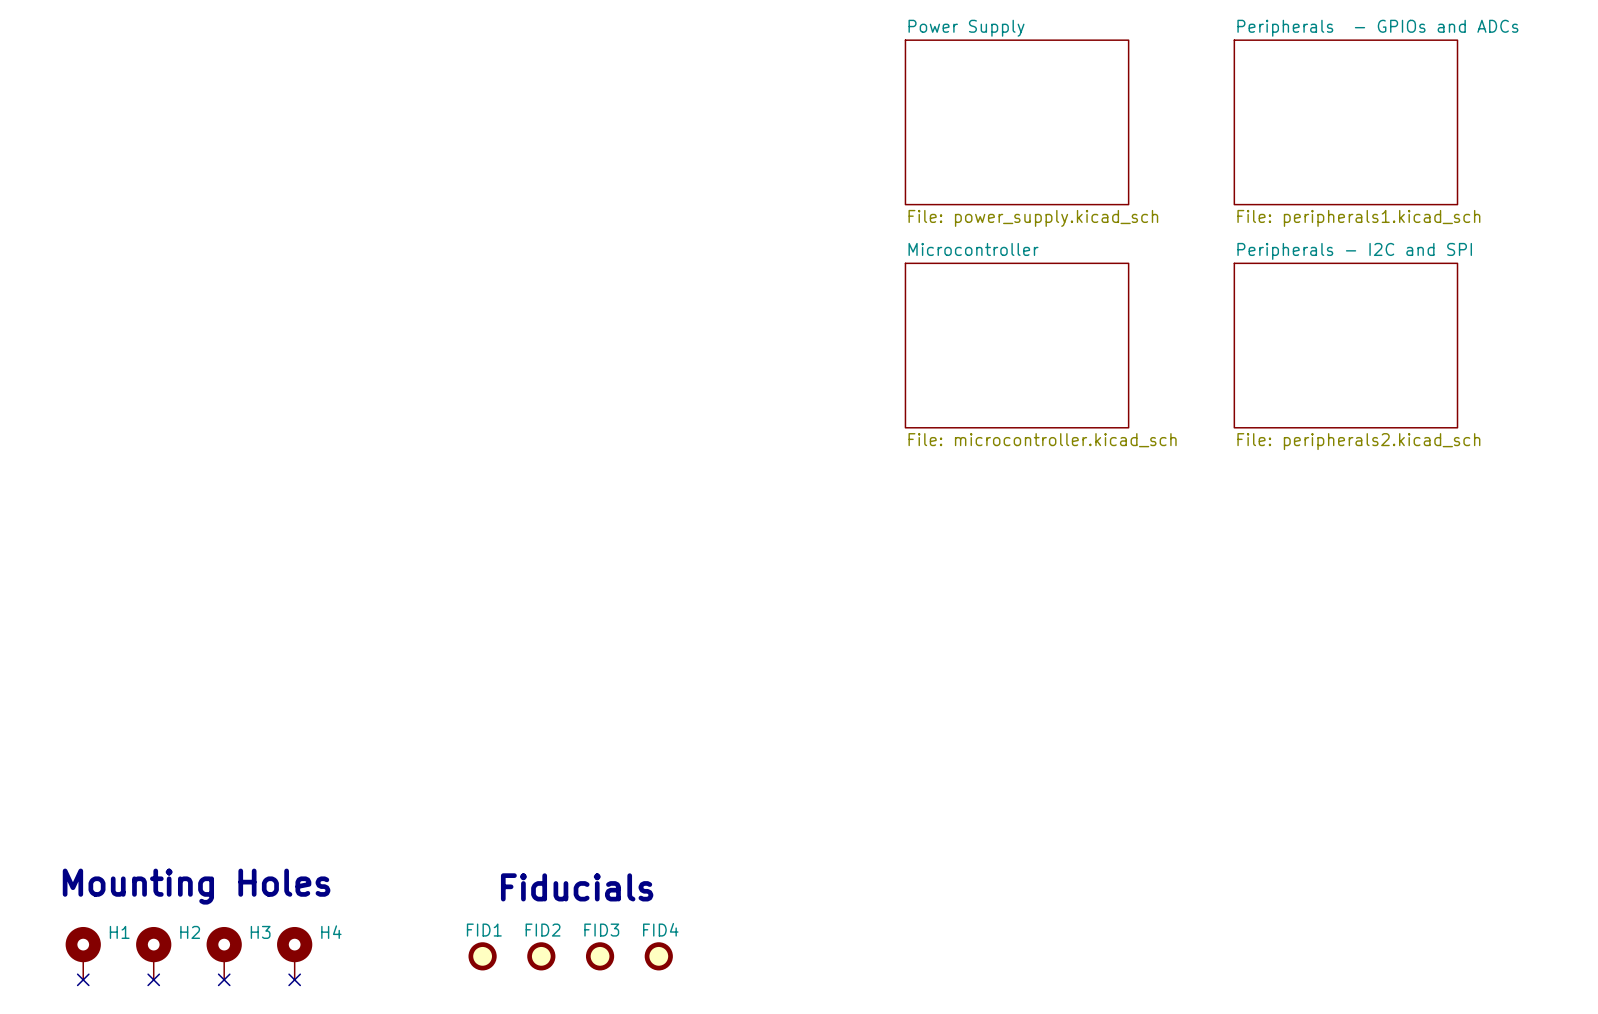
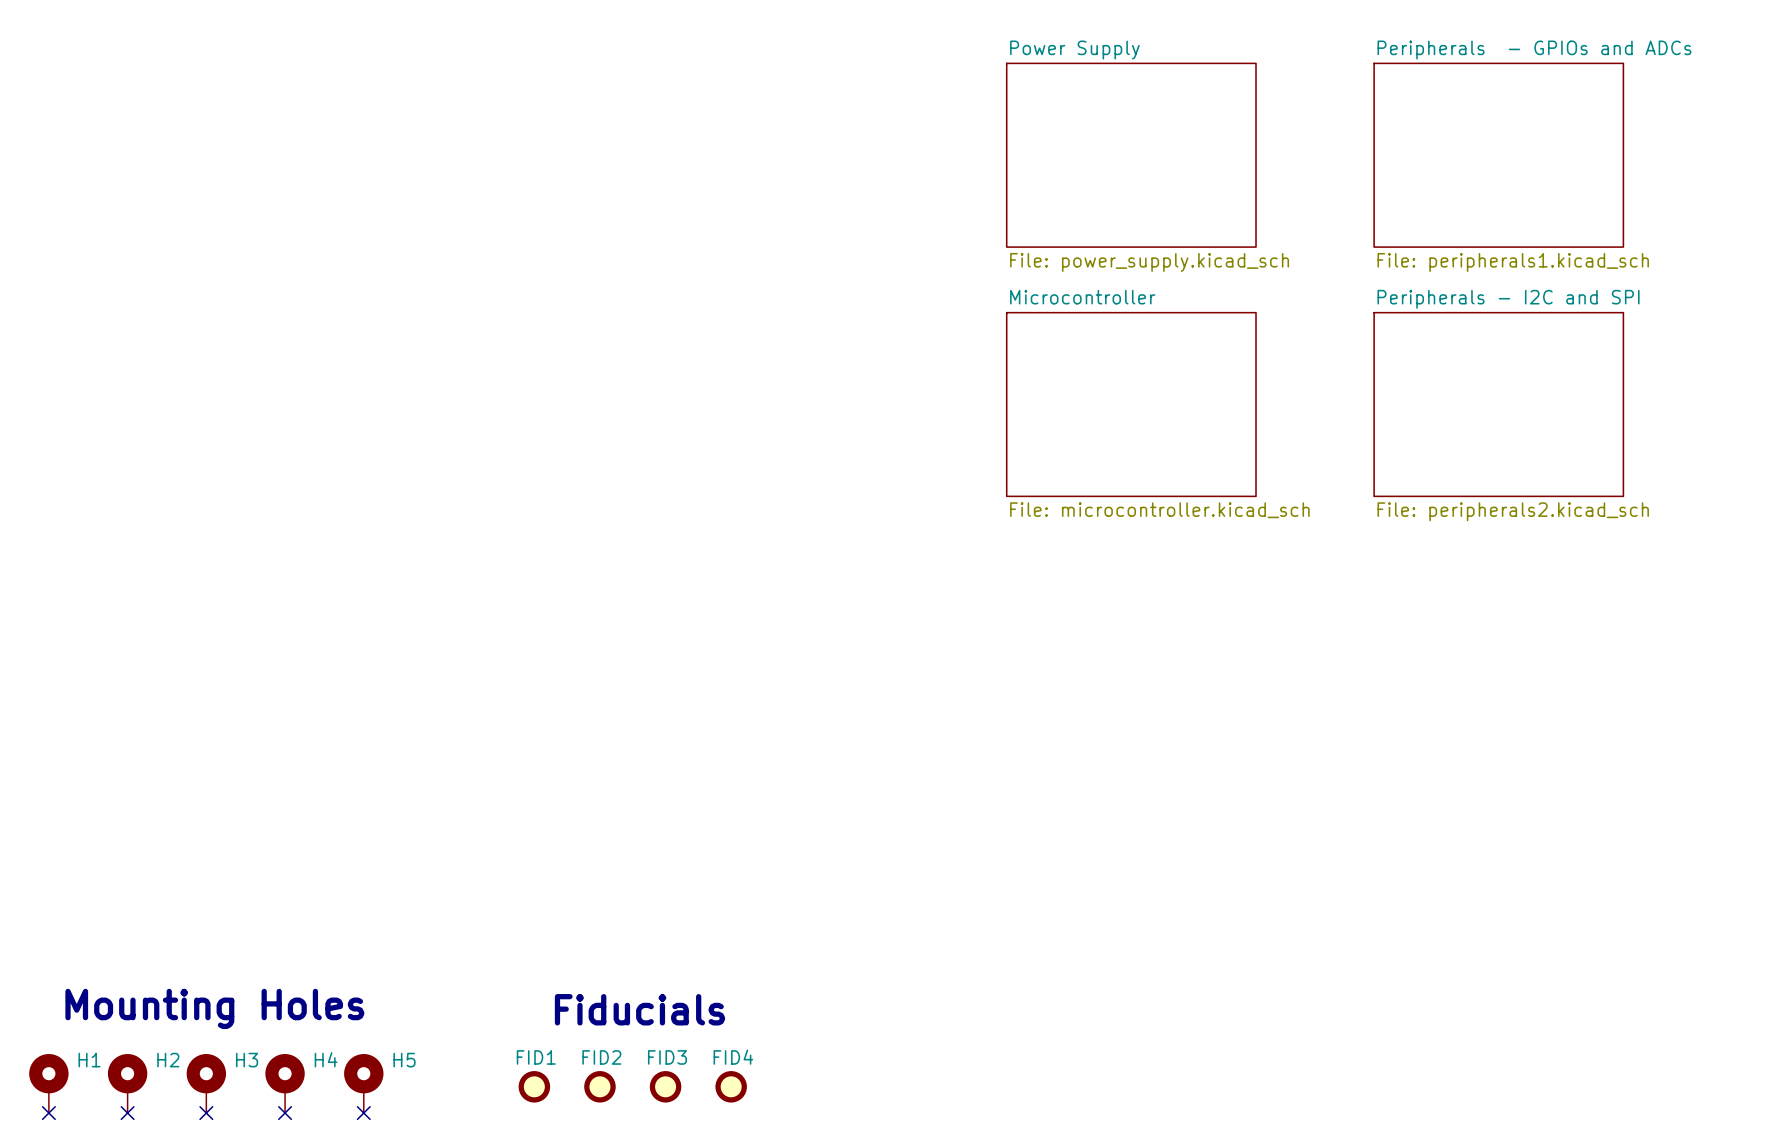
H1 position: (83, 953) -> (48, 1083)
H2 position: (153, 953) -> (127, 1083)
H3 position: (224, 953) -> (206, 1083)
H4 position: (294, 953) -> (285, 1083)
H5: none -> (363, 1083)
no-connect mark: none -> (48, 1113)
no-connect mark: (83, 979) -> none
no-connect mark: none -> (127, 1113)
no-connect mark: (153, 979) -> none
no-connect mark: none -> (206, 1113)
no-connect mark: (224, 979) -> none
no-connect mark: none -> (285, 1113)
no-connect mark: (294, 979) -> none
no-connect mark: none -> (363, 1113)

